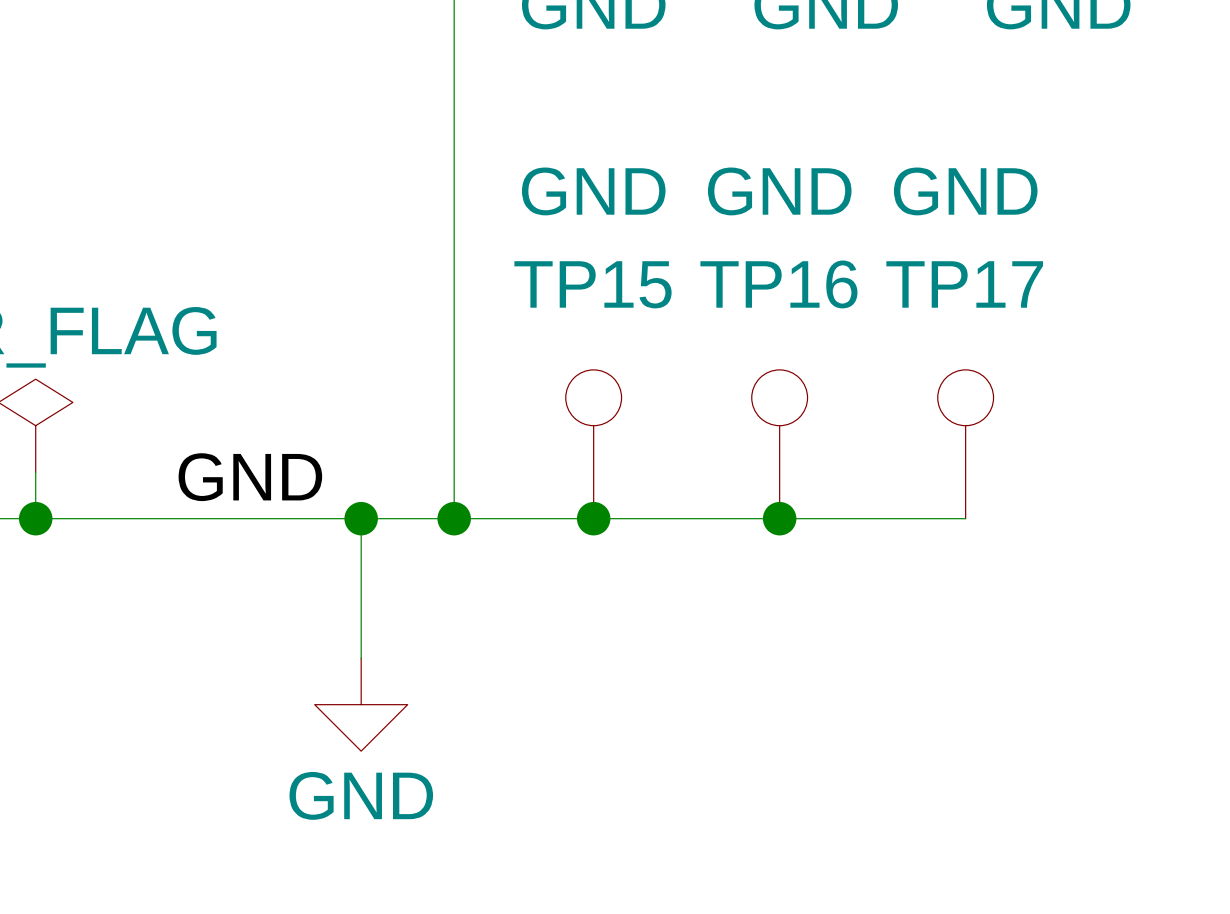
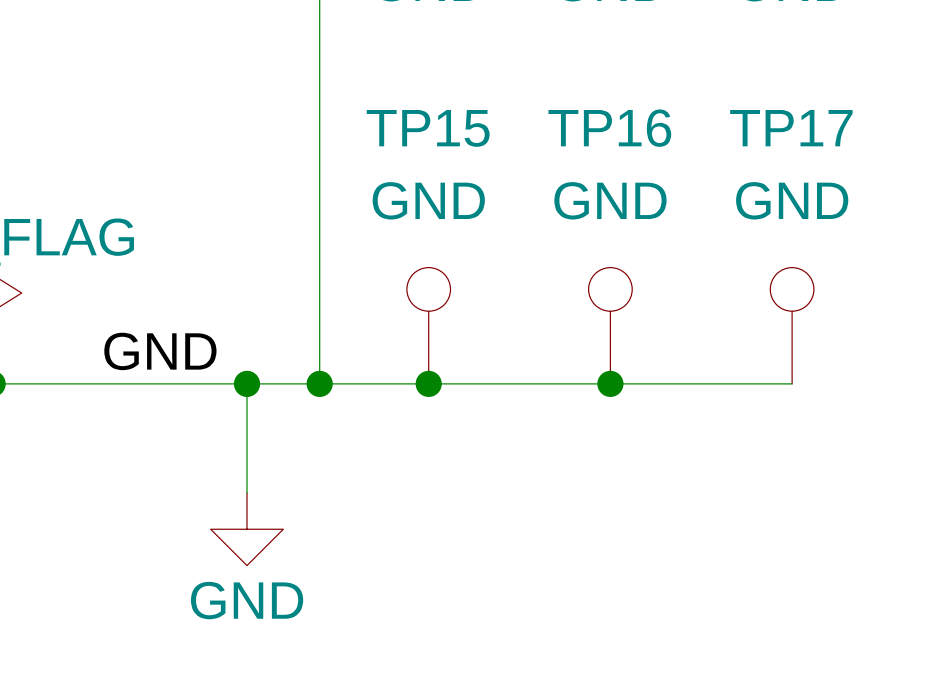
TP15 value position: GND (593, 191) -> GND (428, 200)
TP16 value position: GND (779, 191) -> GND (610, 200)
TP17 value position: GND (965, 191) -> GND (792, 200)
TP15 name position: TP15 (593, 284) -> TP15 (428, 128)
TP16 name position: TP16 (778, 284) -> TP16 (609, 128)
TP17 name position: TP17 (964, 284) -> TP17 (791, 128)
TP16 position: (779, 444) -> (610, 325)
TP17 position: (965, 444) -> (792, 325)
junction position: (779, 518) -> (610, 383)
wire: none -> (719, 383) (792, 383)

